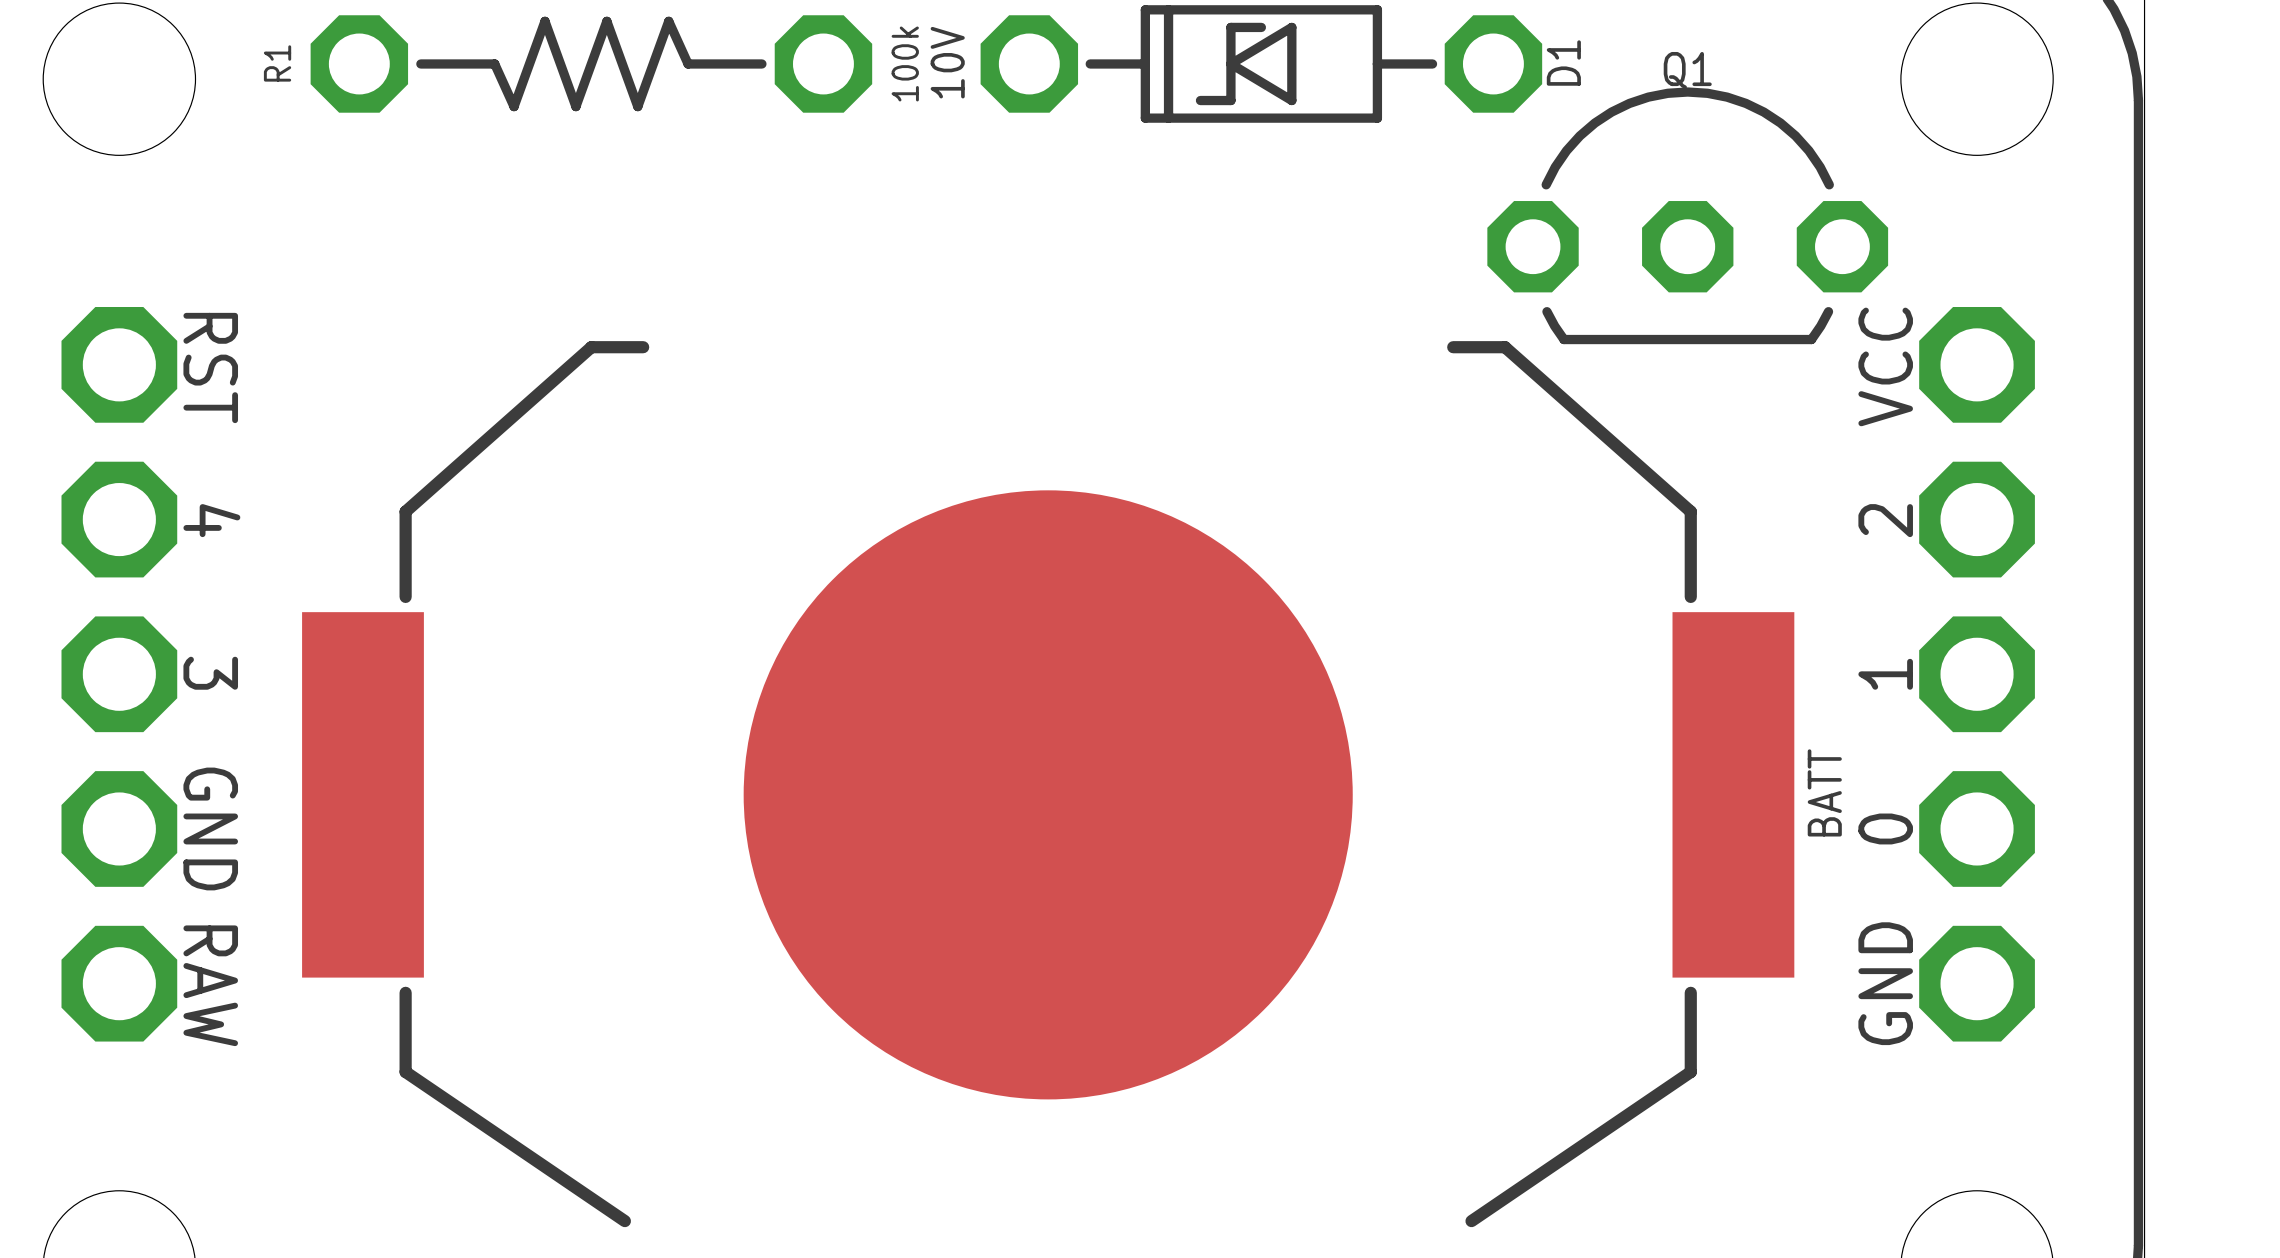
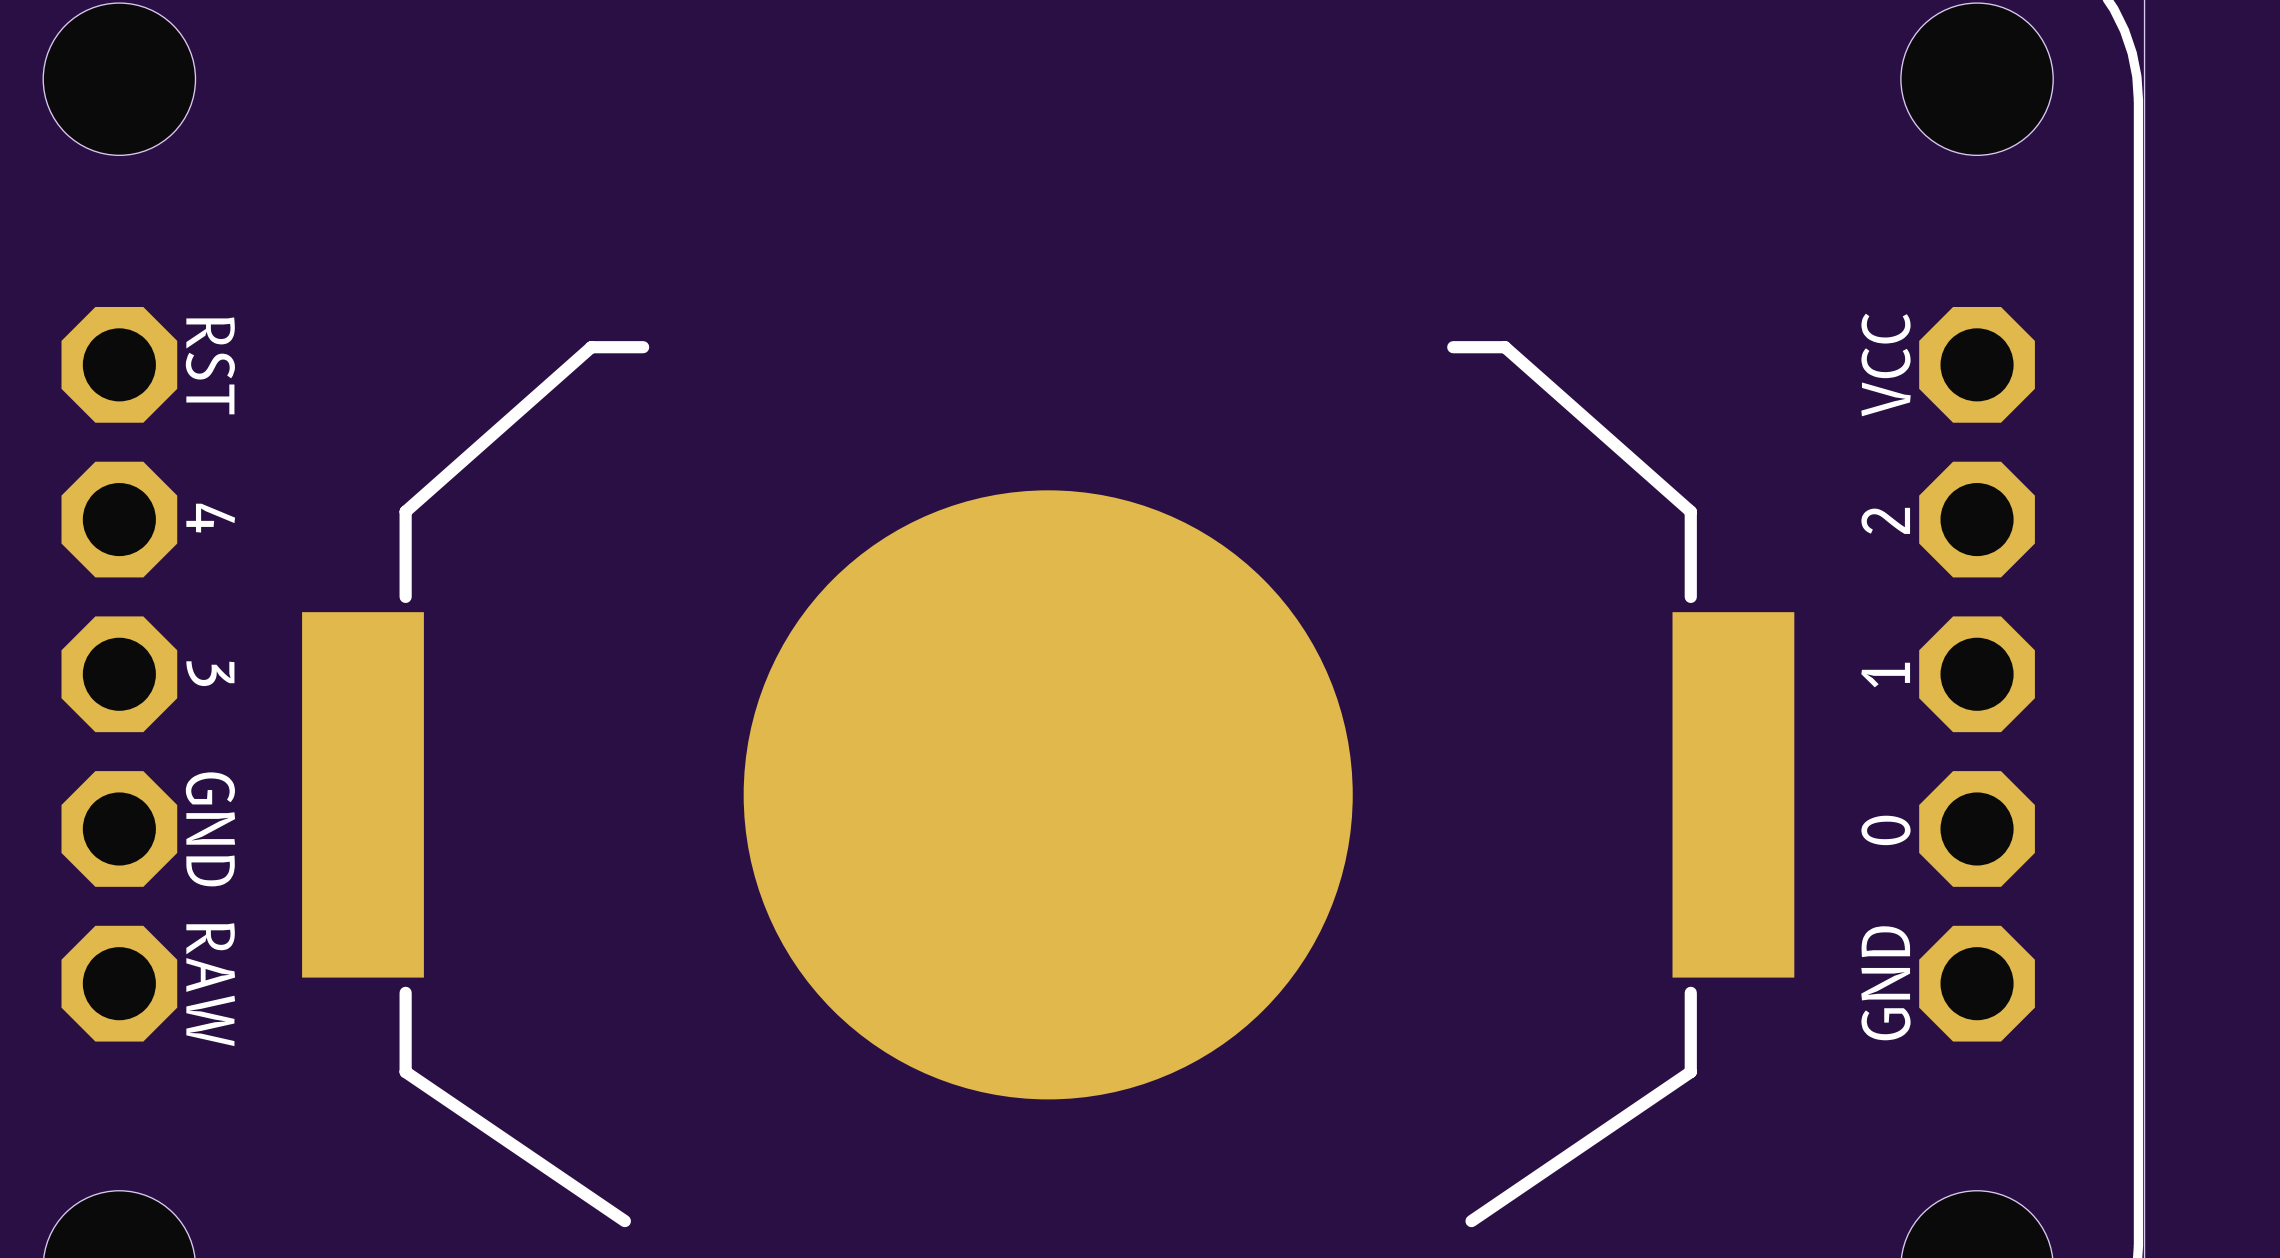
R1: 100k (591, 63) -> none
D1: 10V (1261, 63) -> none
Q1: (1687, 215) -> none
BATT name: BATT (1824, 792) -> none

